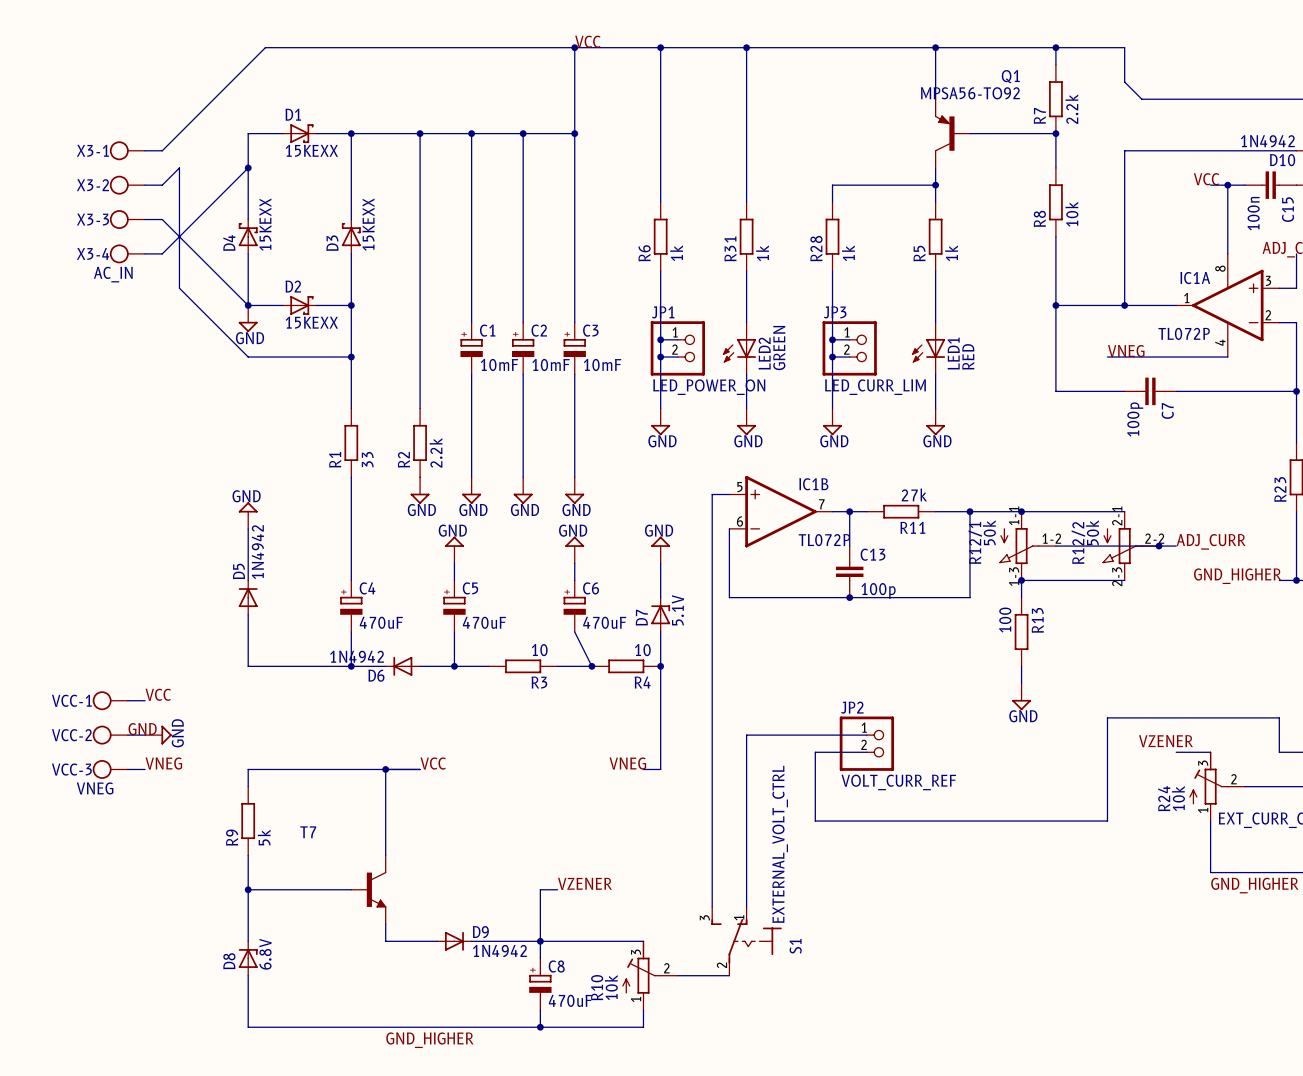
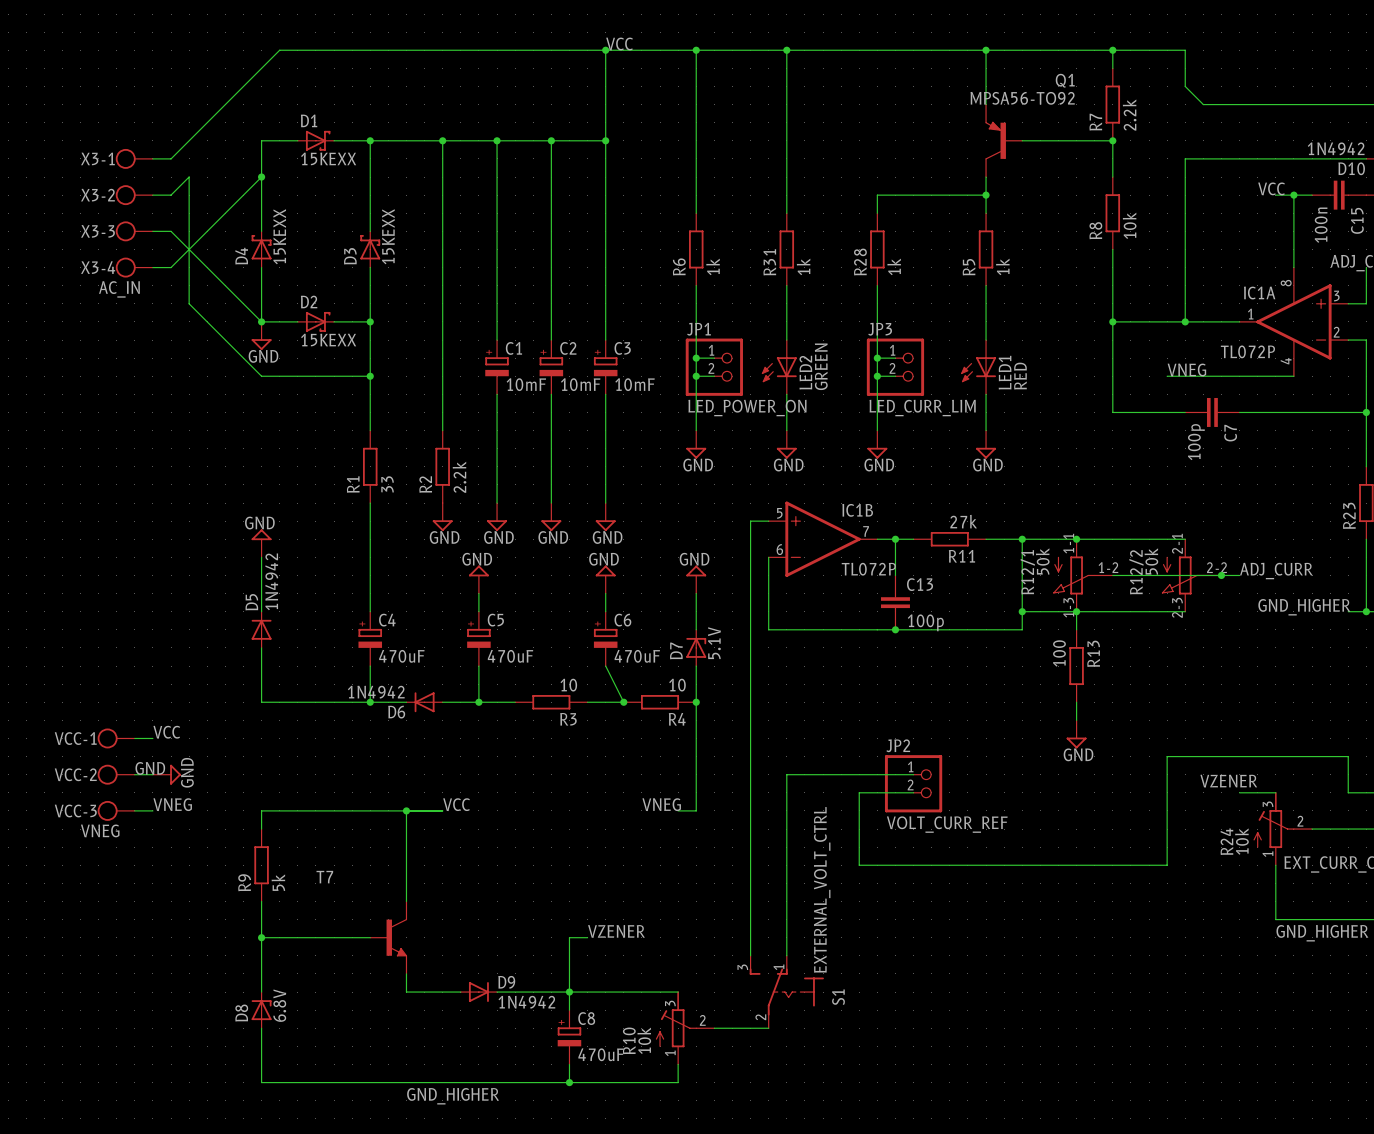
wire: none -> (1022, 611) (1076, 611)
junction: none -> (1022, 611)

